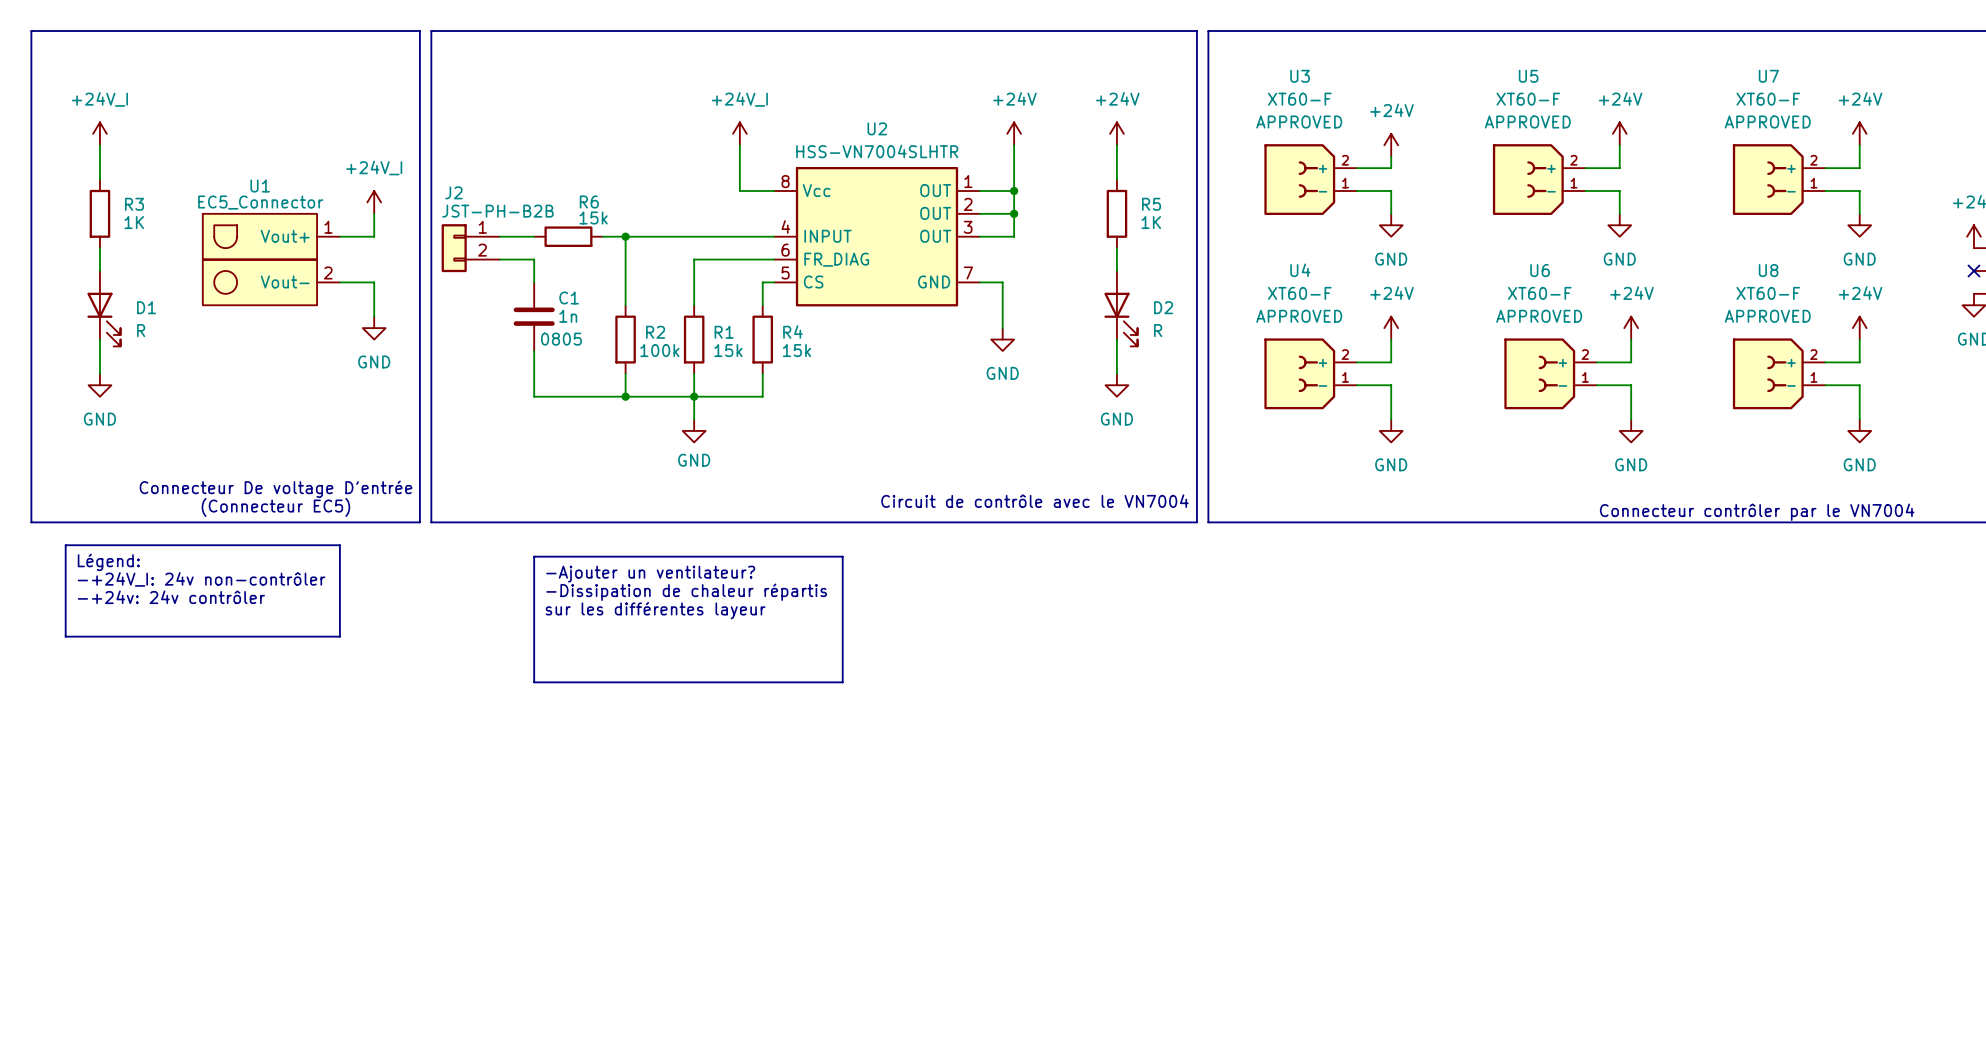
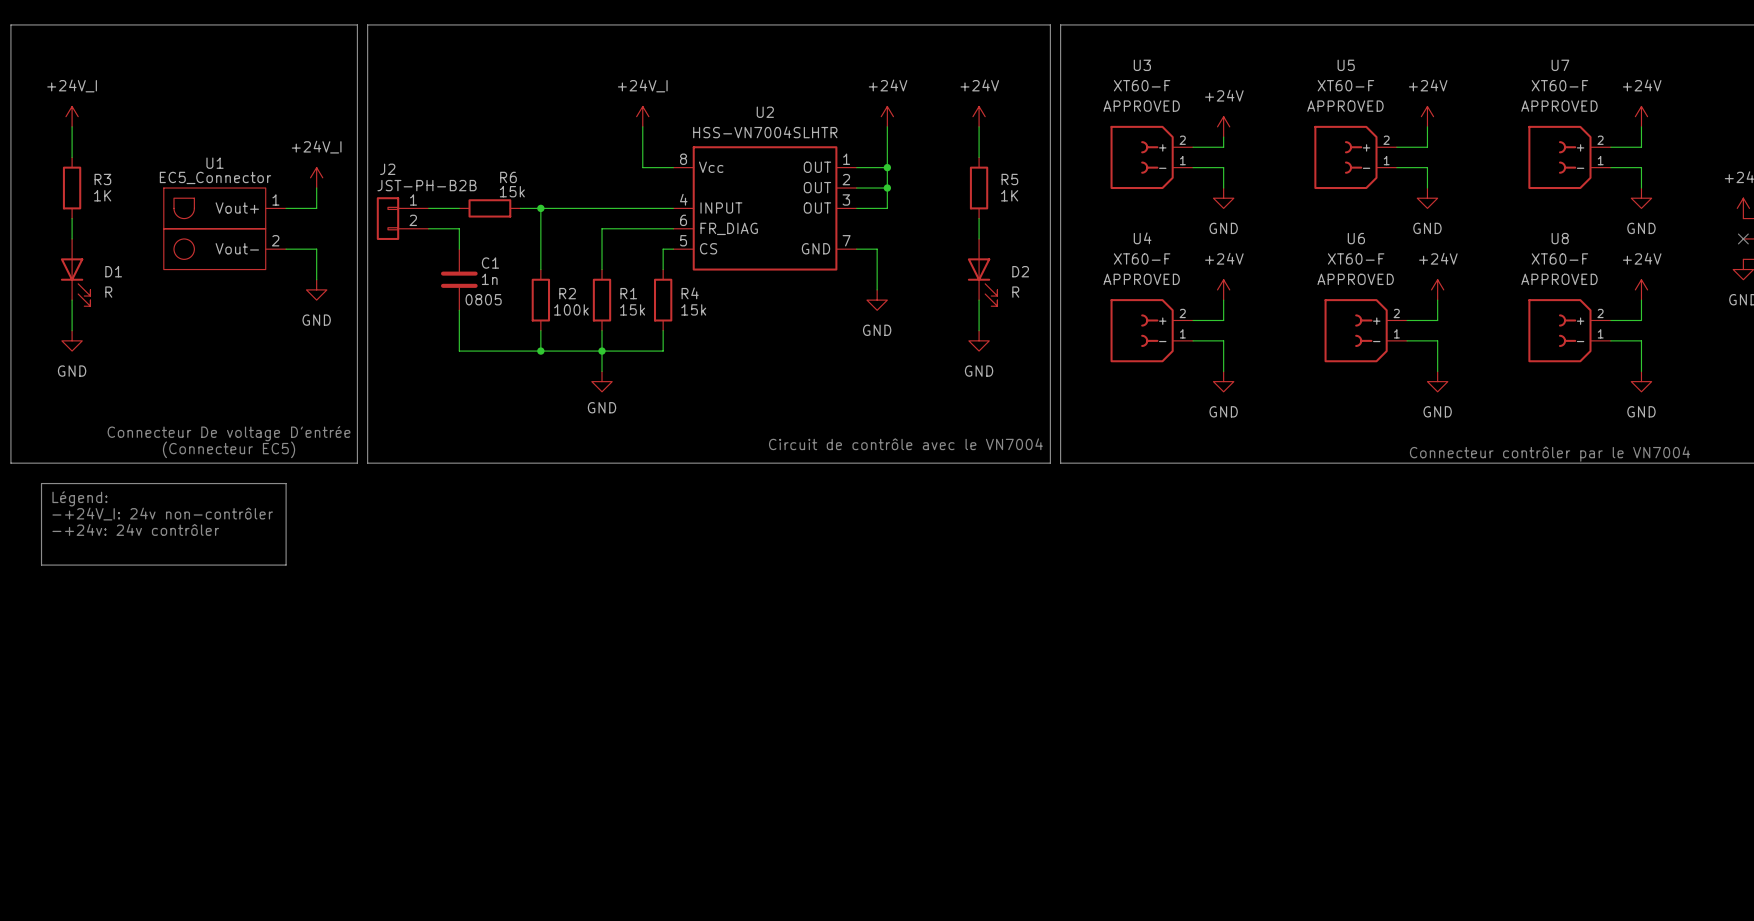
line: (534, 556) (842, 556) (842, 682) (534, 682) (534, 556) -> none
text: -Ajouter un ventilateur? (650, 574) -> none
text: -Dissipation de chaleur répartis (686, 592) -> none
text: sur les différentes layeur (655, 610) -> none

